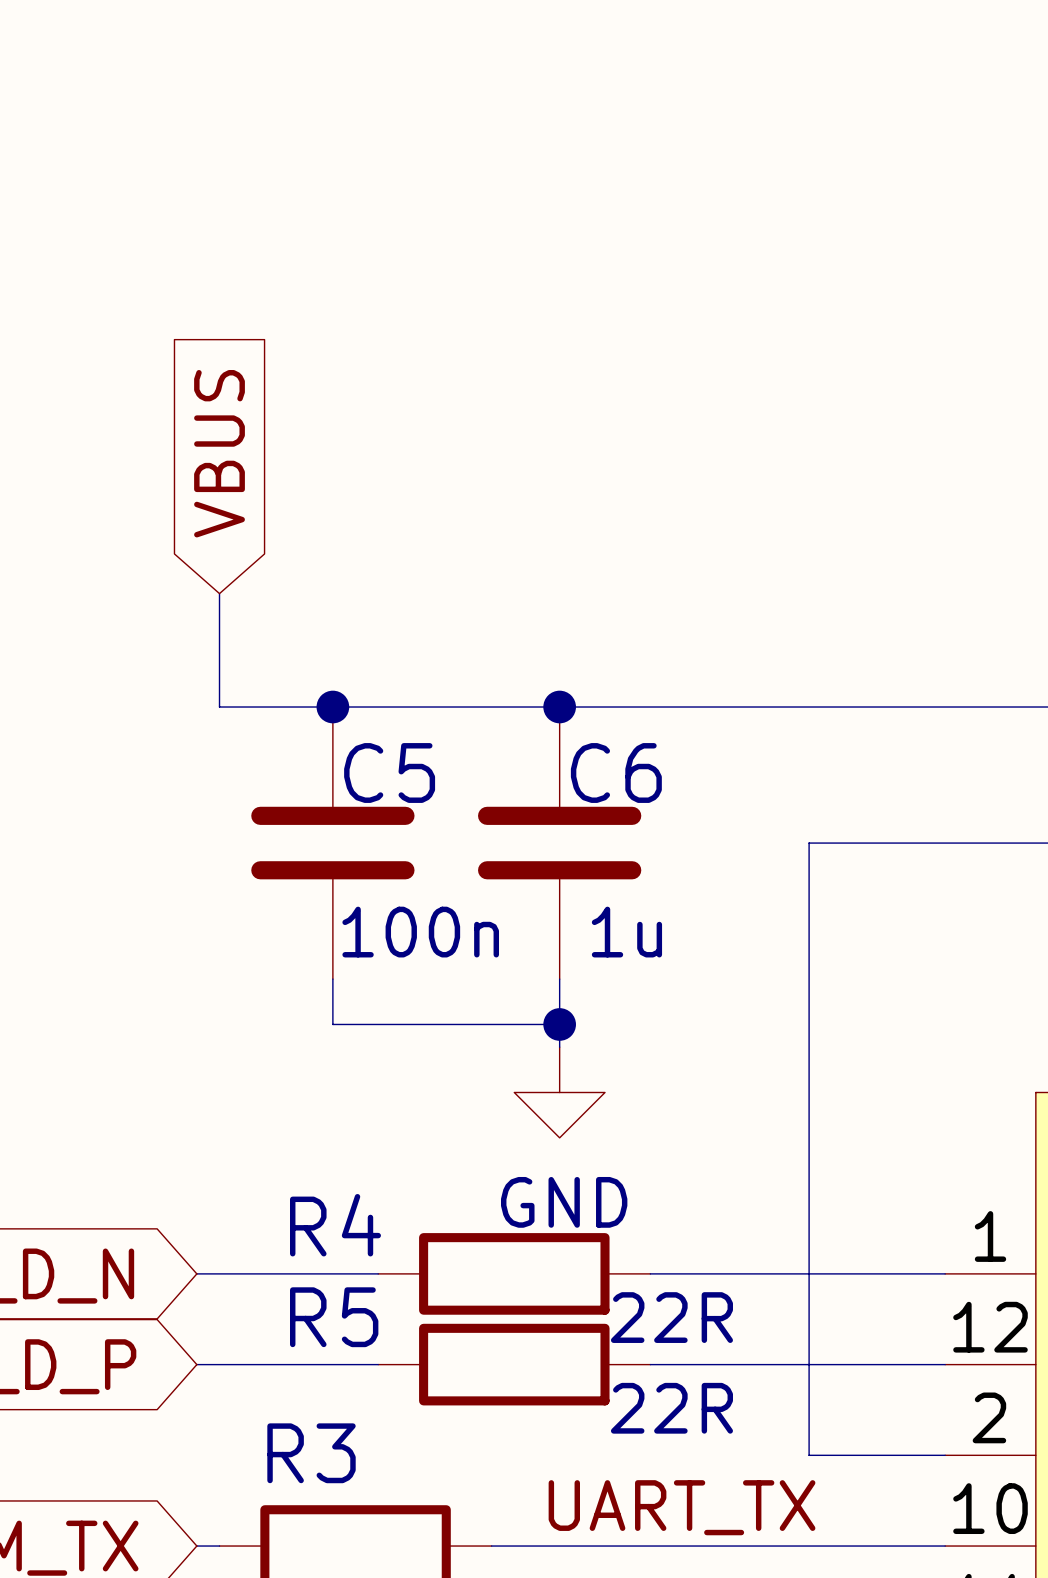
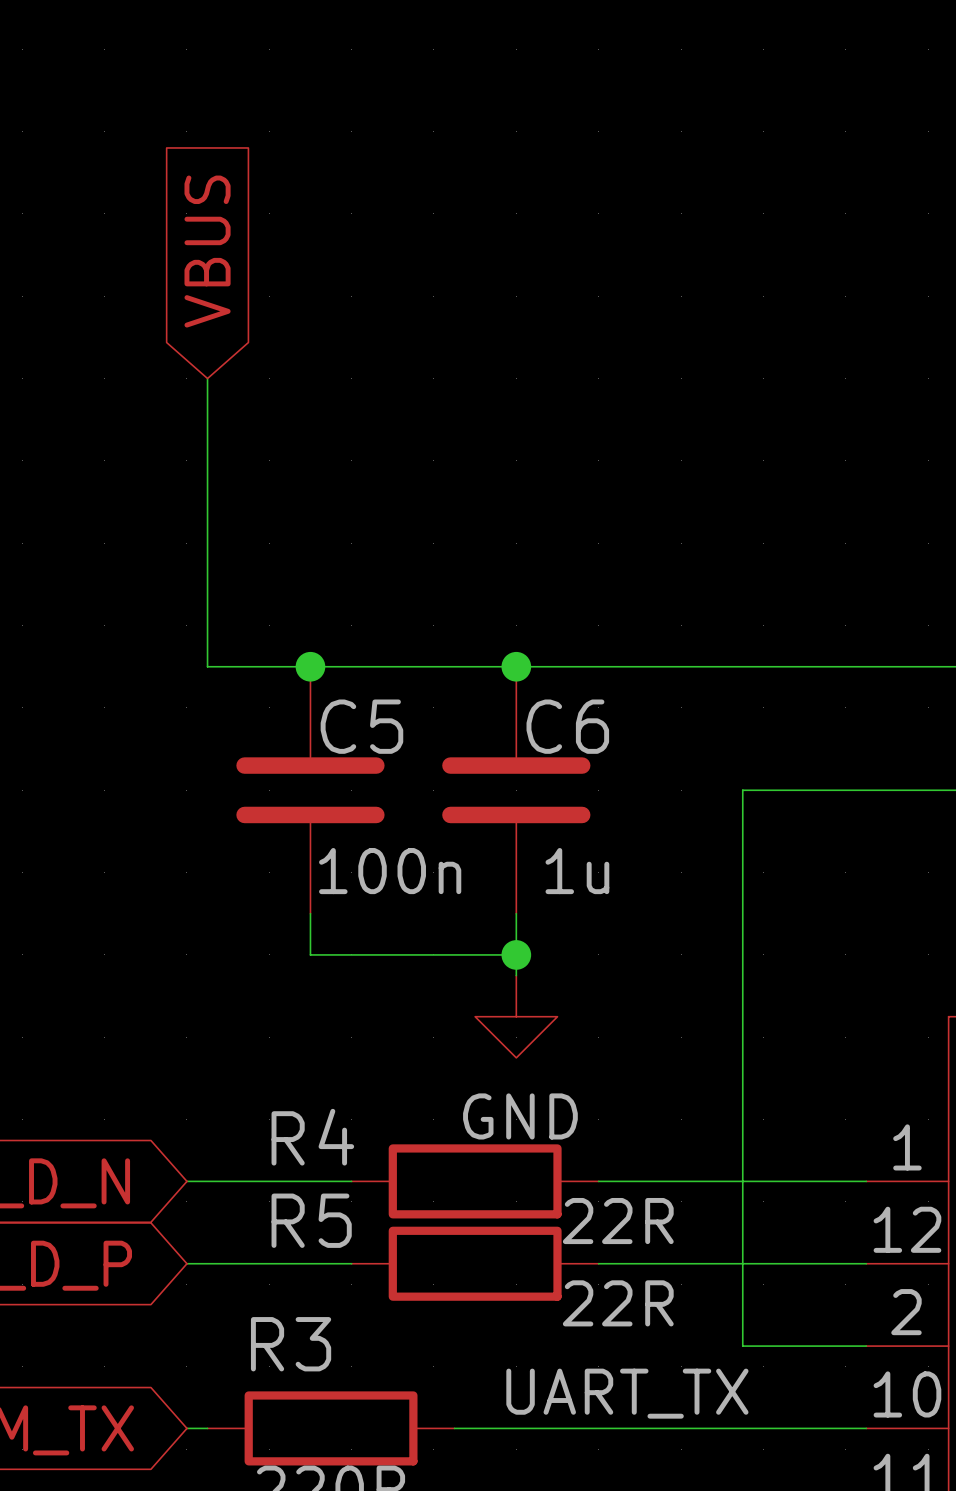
wire: none -> (207, 378) (207, 563)
global label position: VBUS (219, 453) -> VBUS (207, 251)

